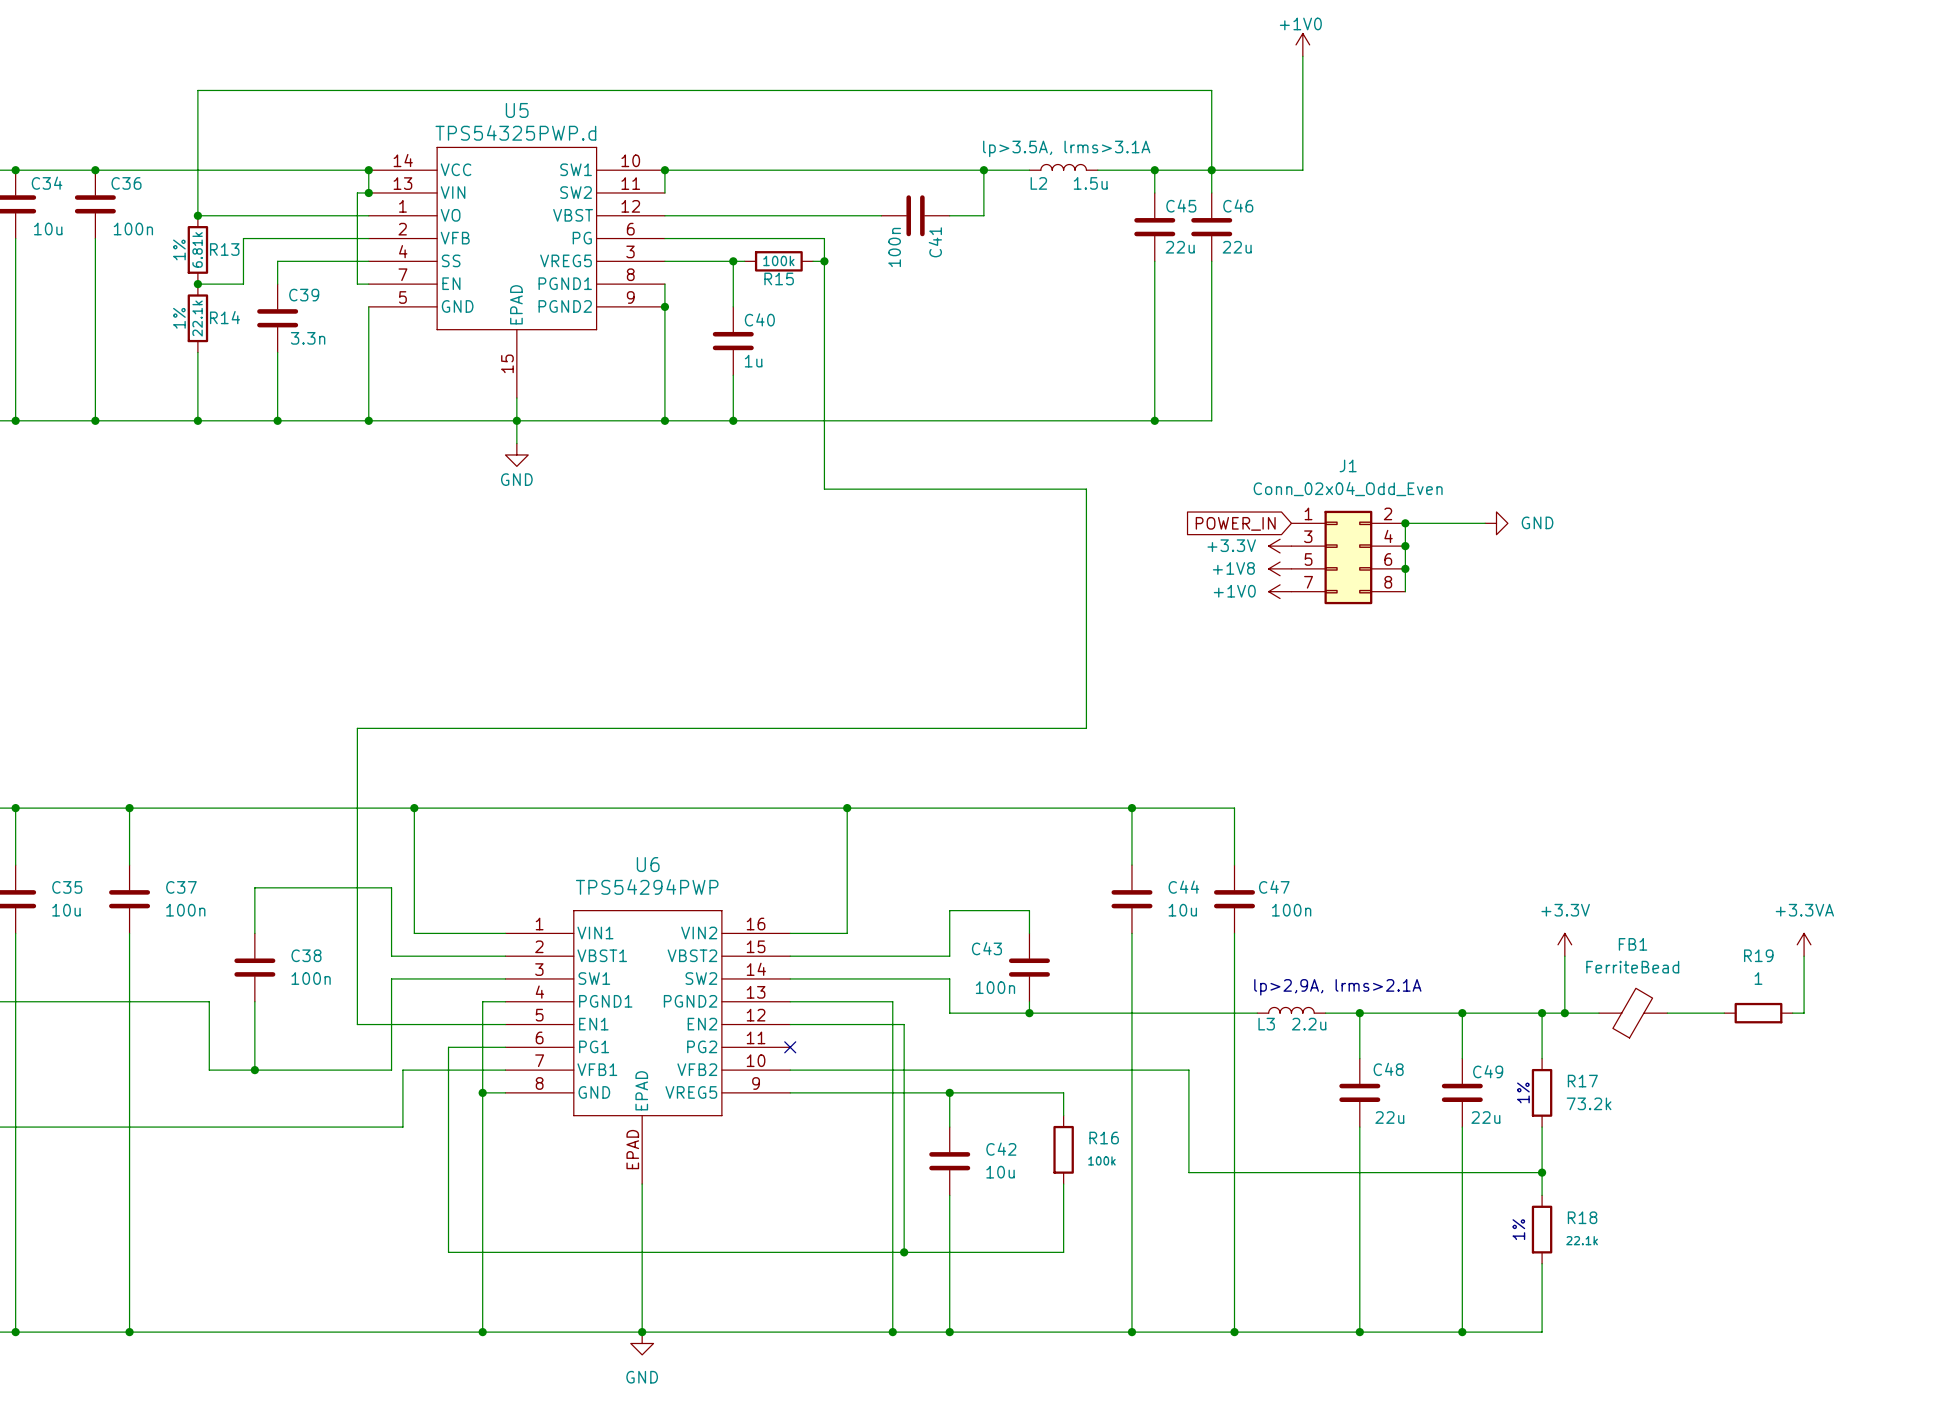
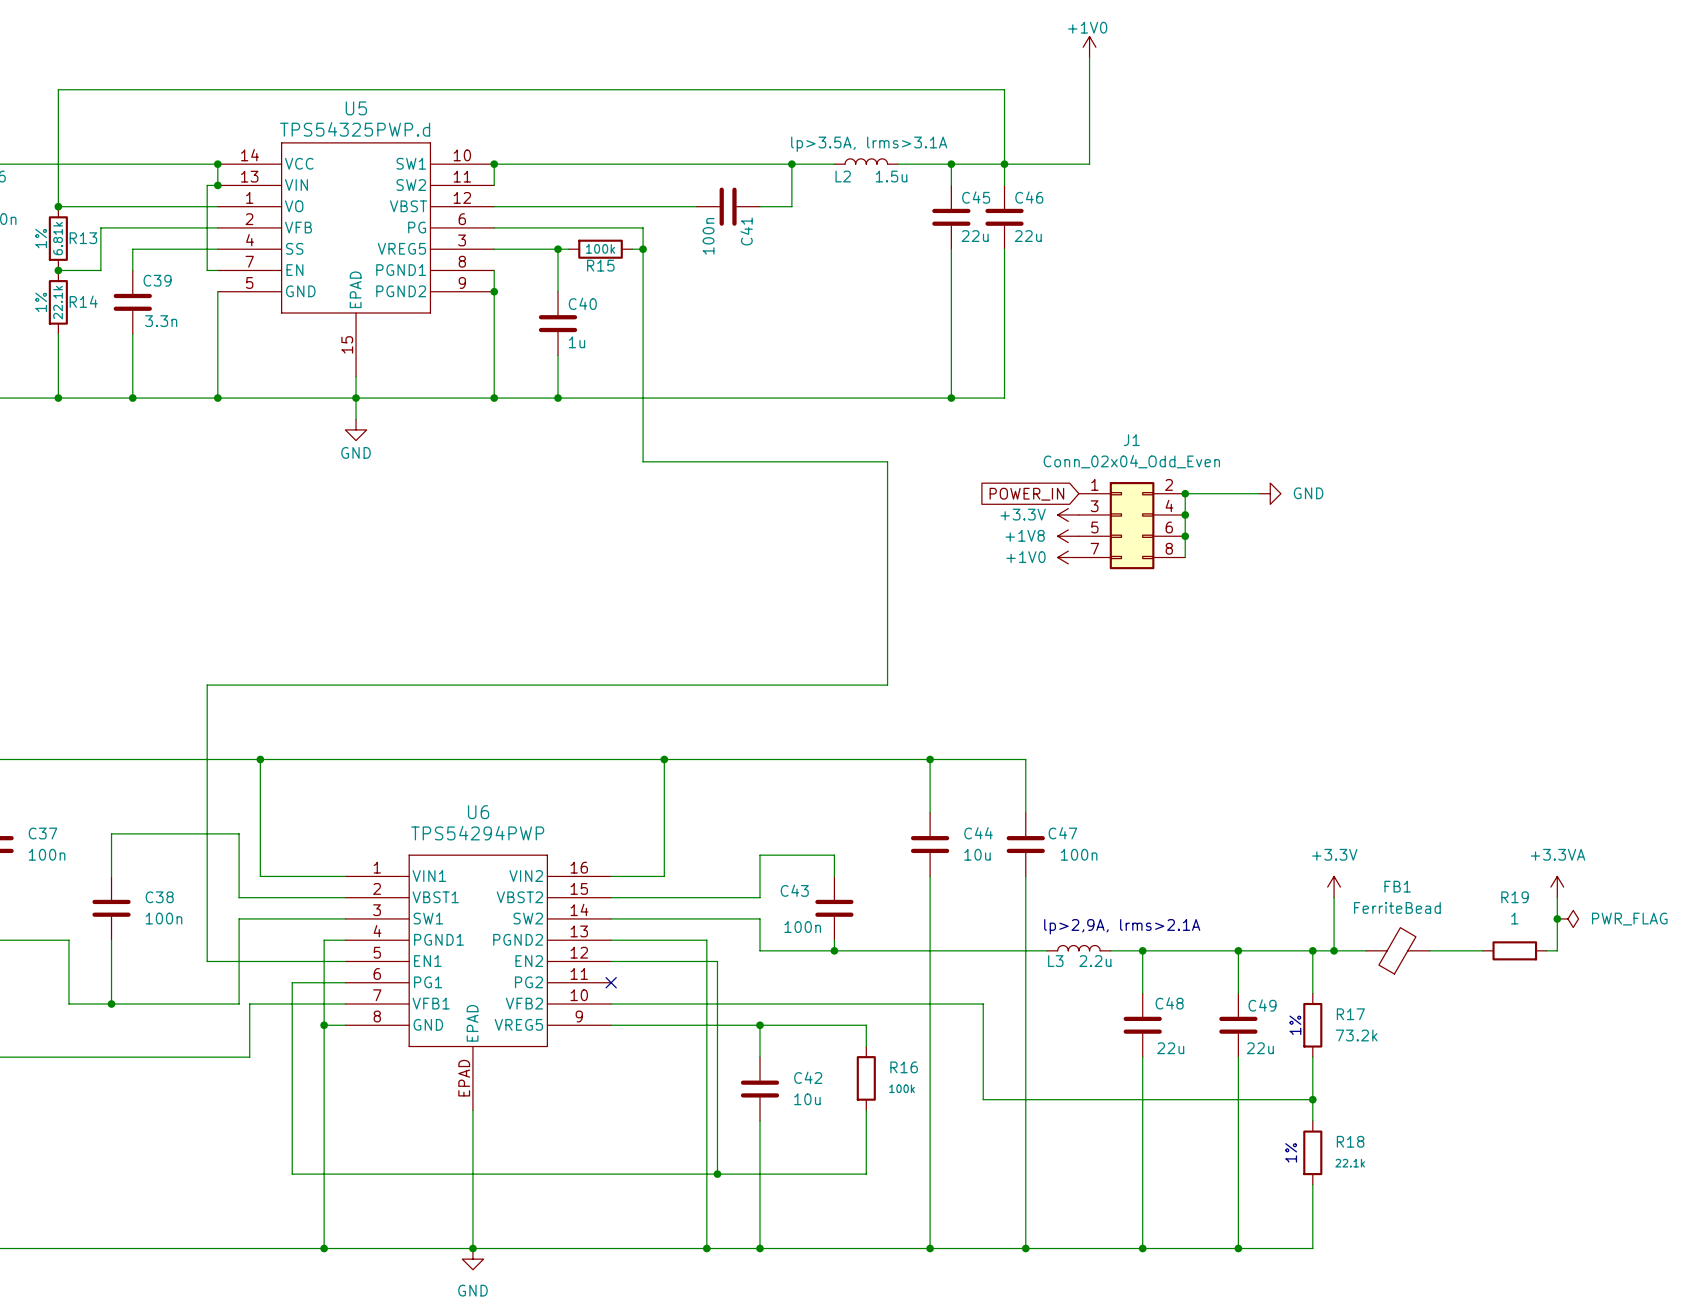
junction: none -> (1557, 918)
power symbol: none -> PWR_FLAG (1567, 918)

